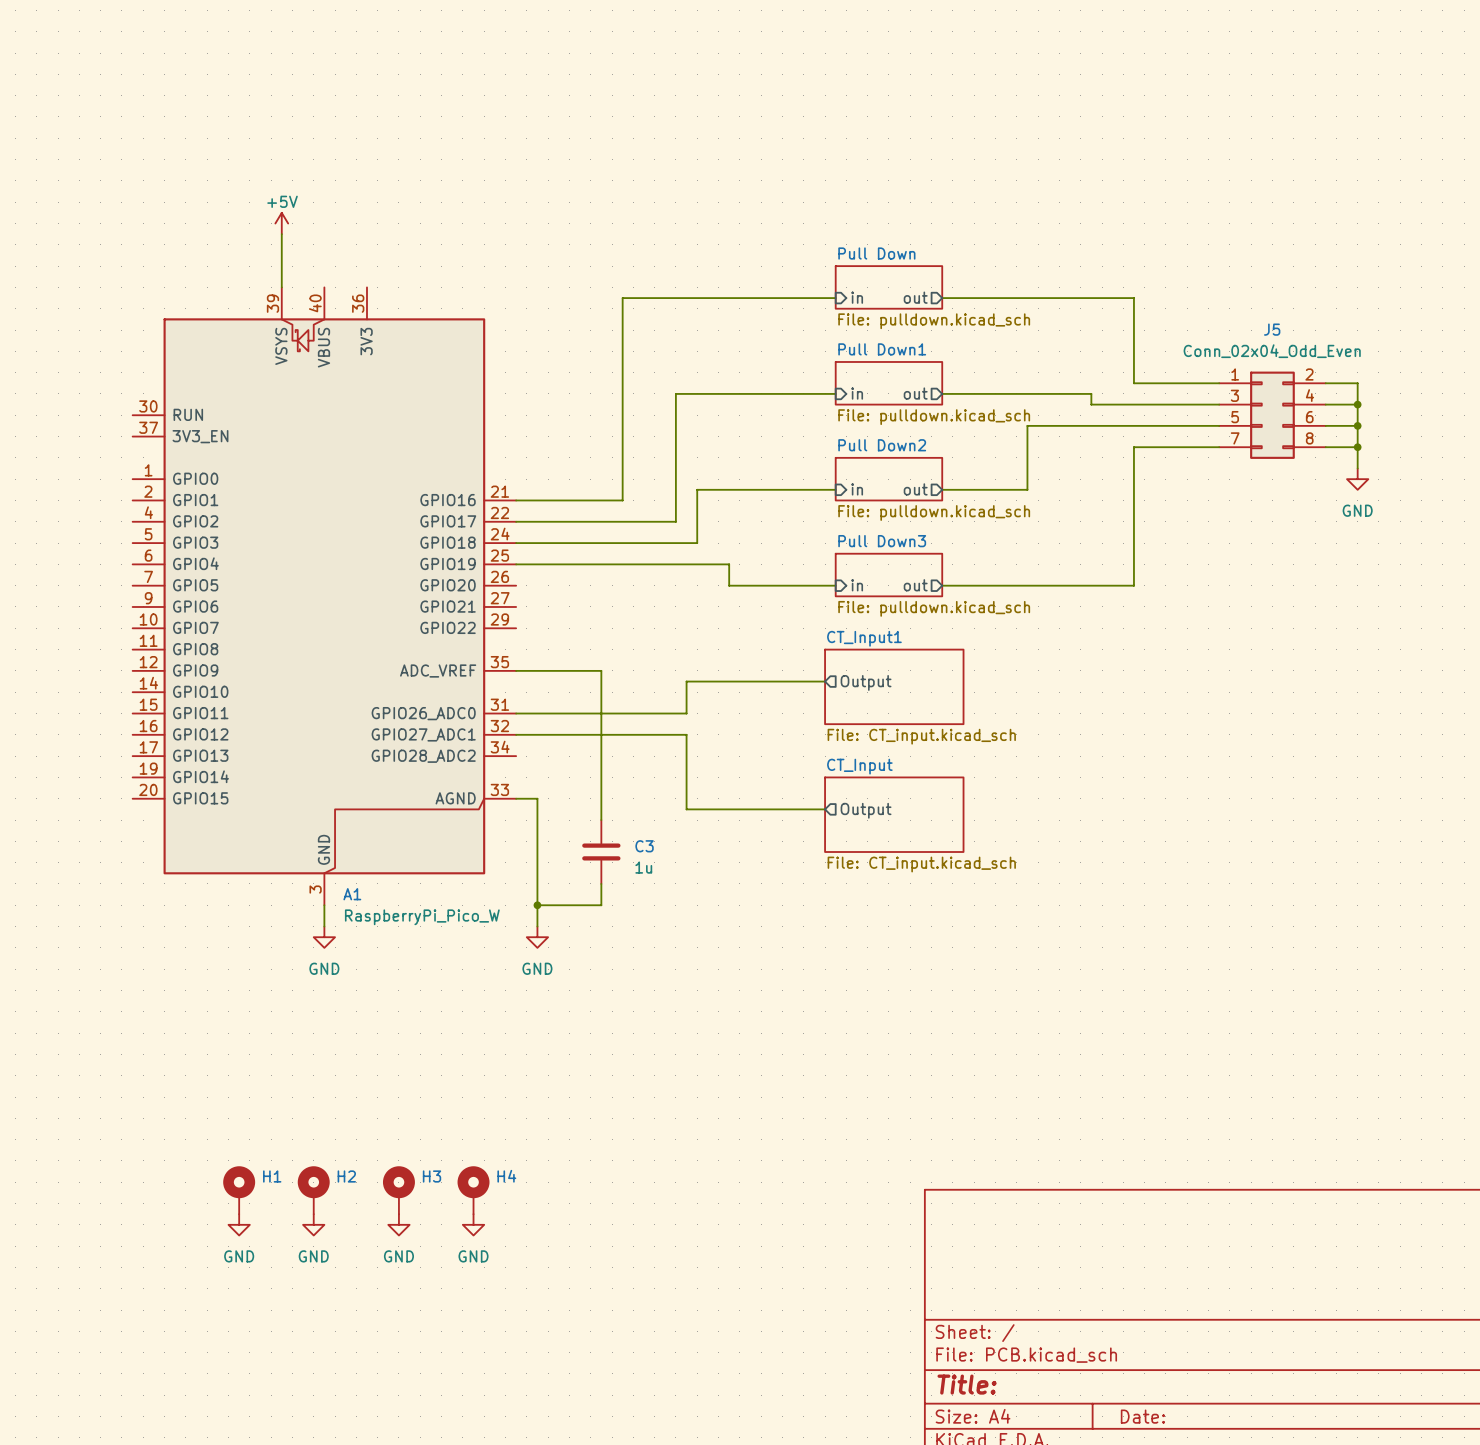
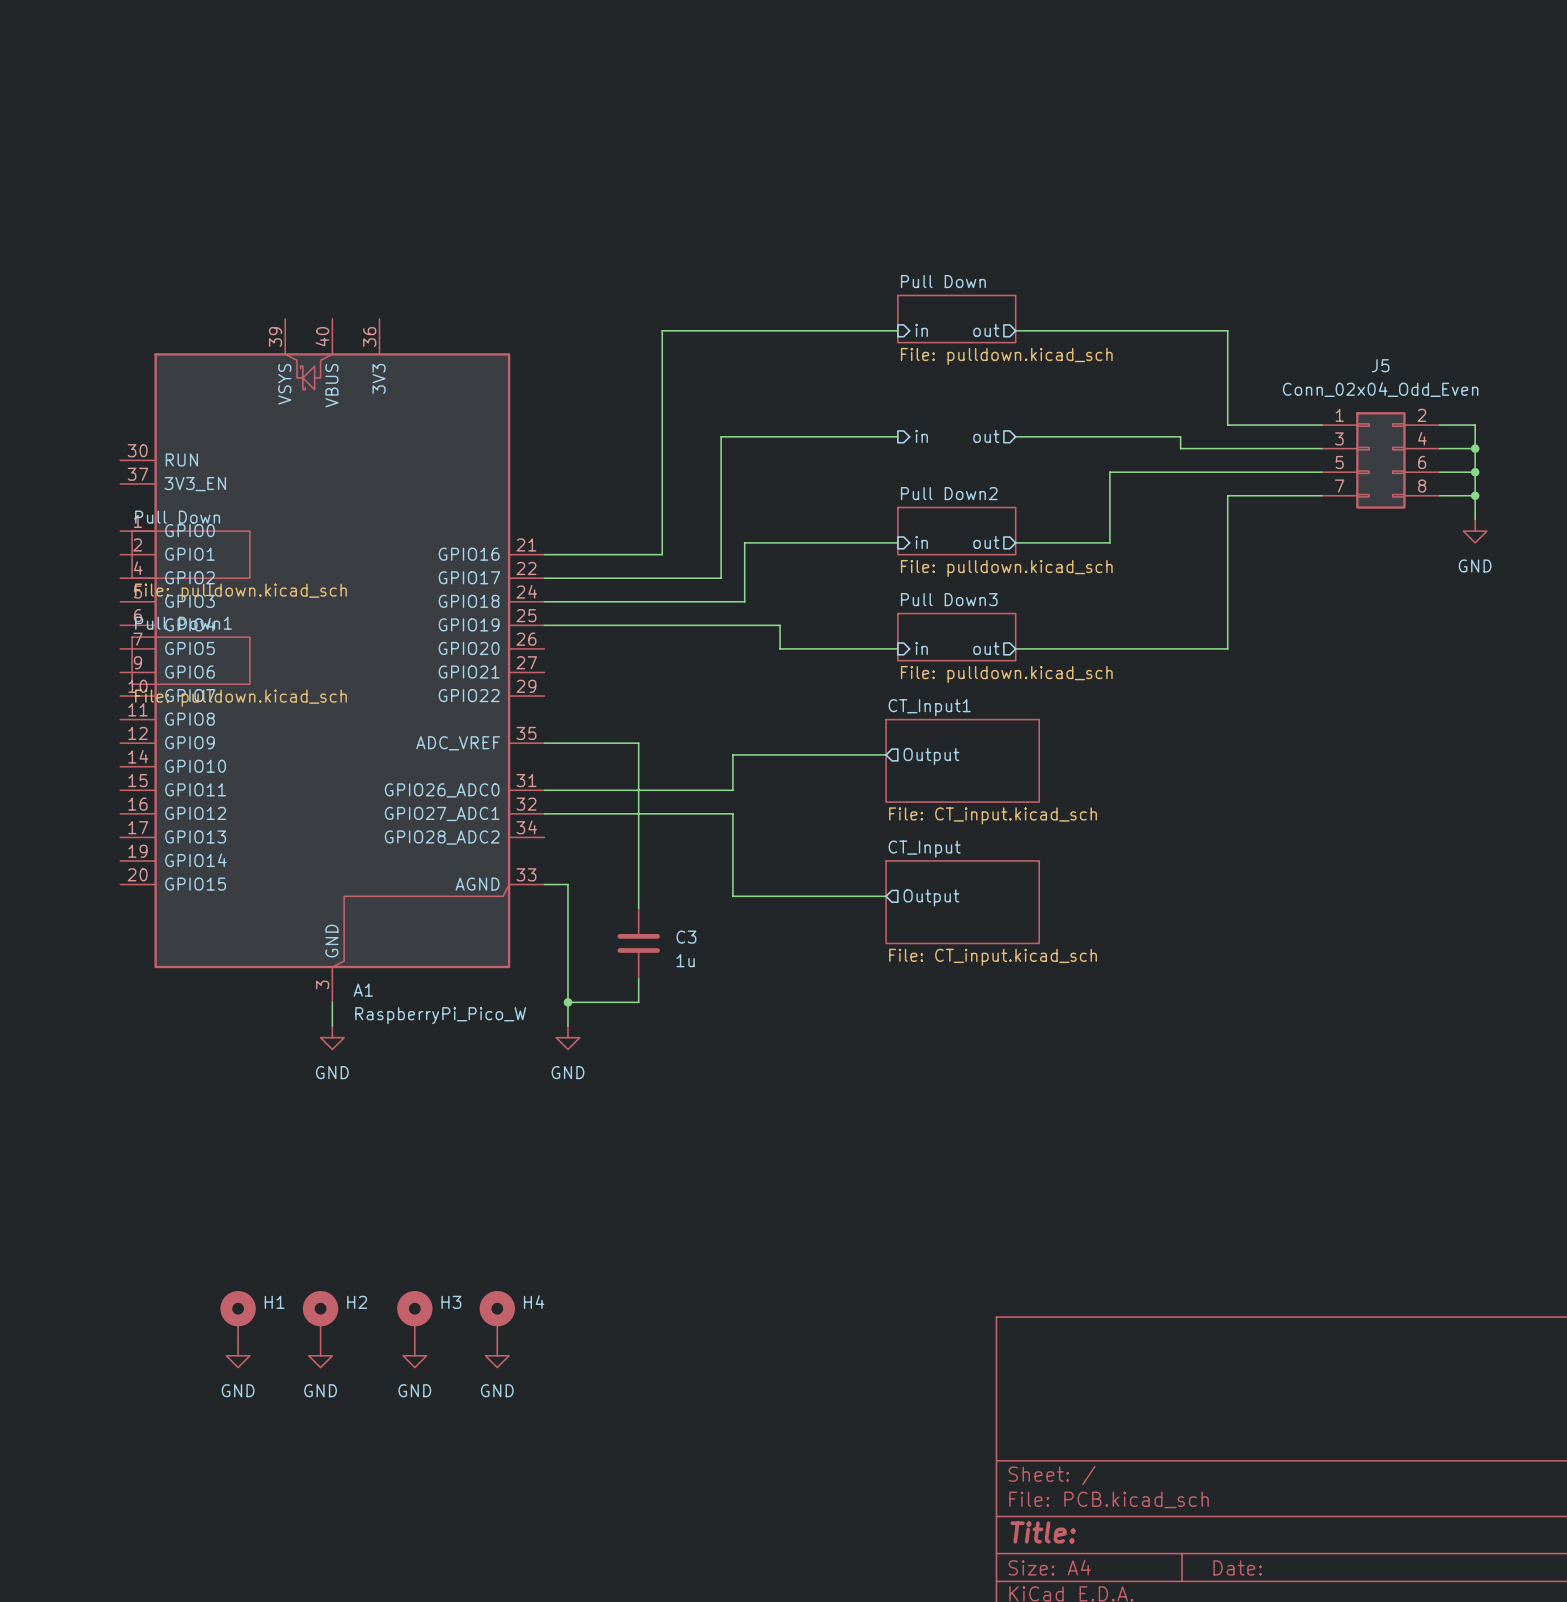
power symbol: +5V (281, 223) -> none
wire: (281, 234) (281, 287) -> none
sheet Pull Down1 position: (888, 383) -> (190, 660)
sheet Pull Down: none -> File: pulldown.kicad_sch (190, 554)

